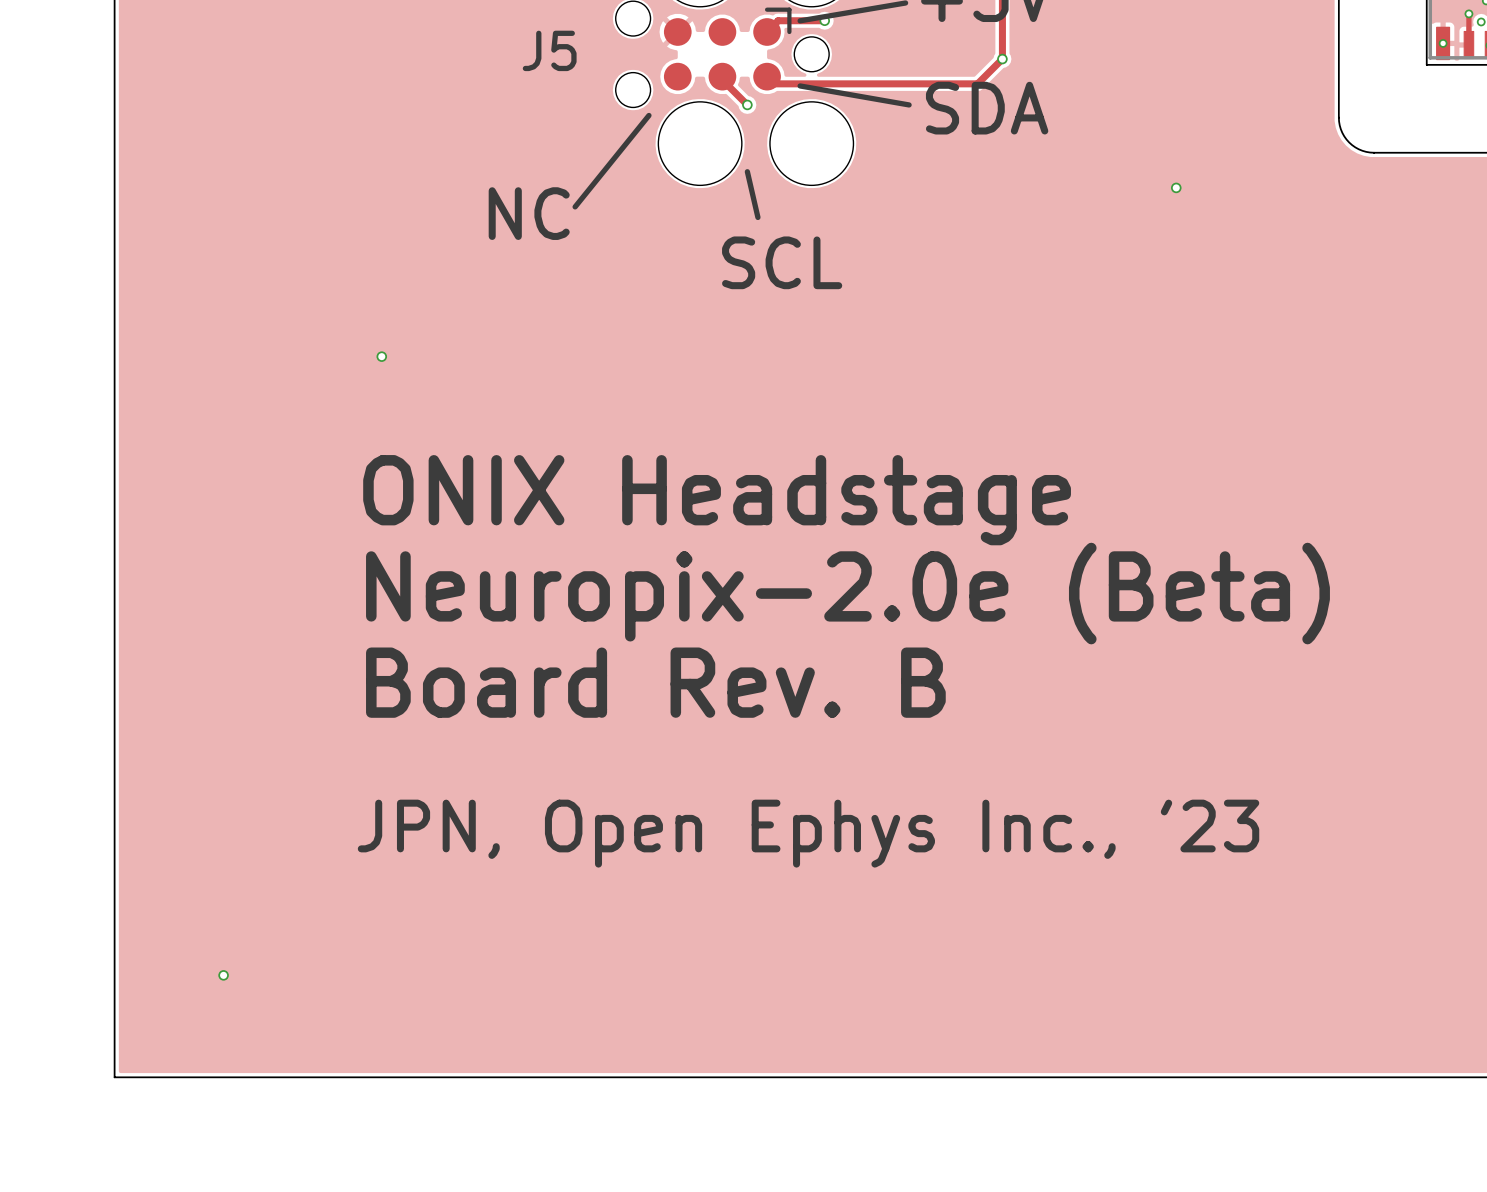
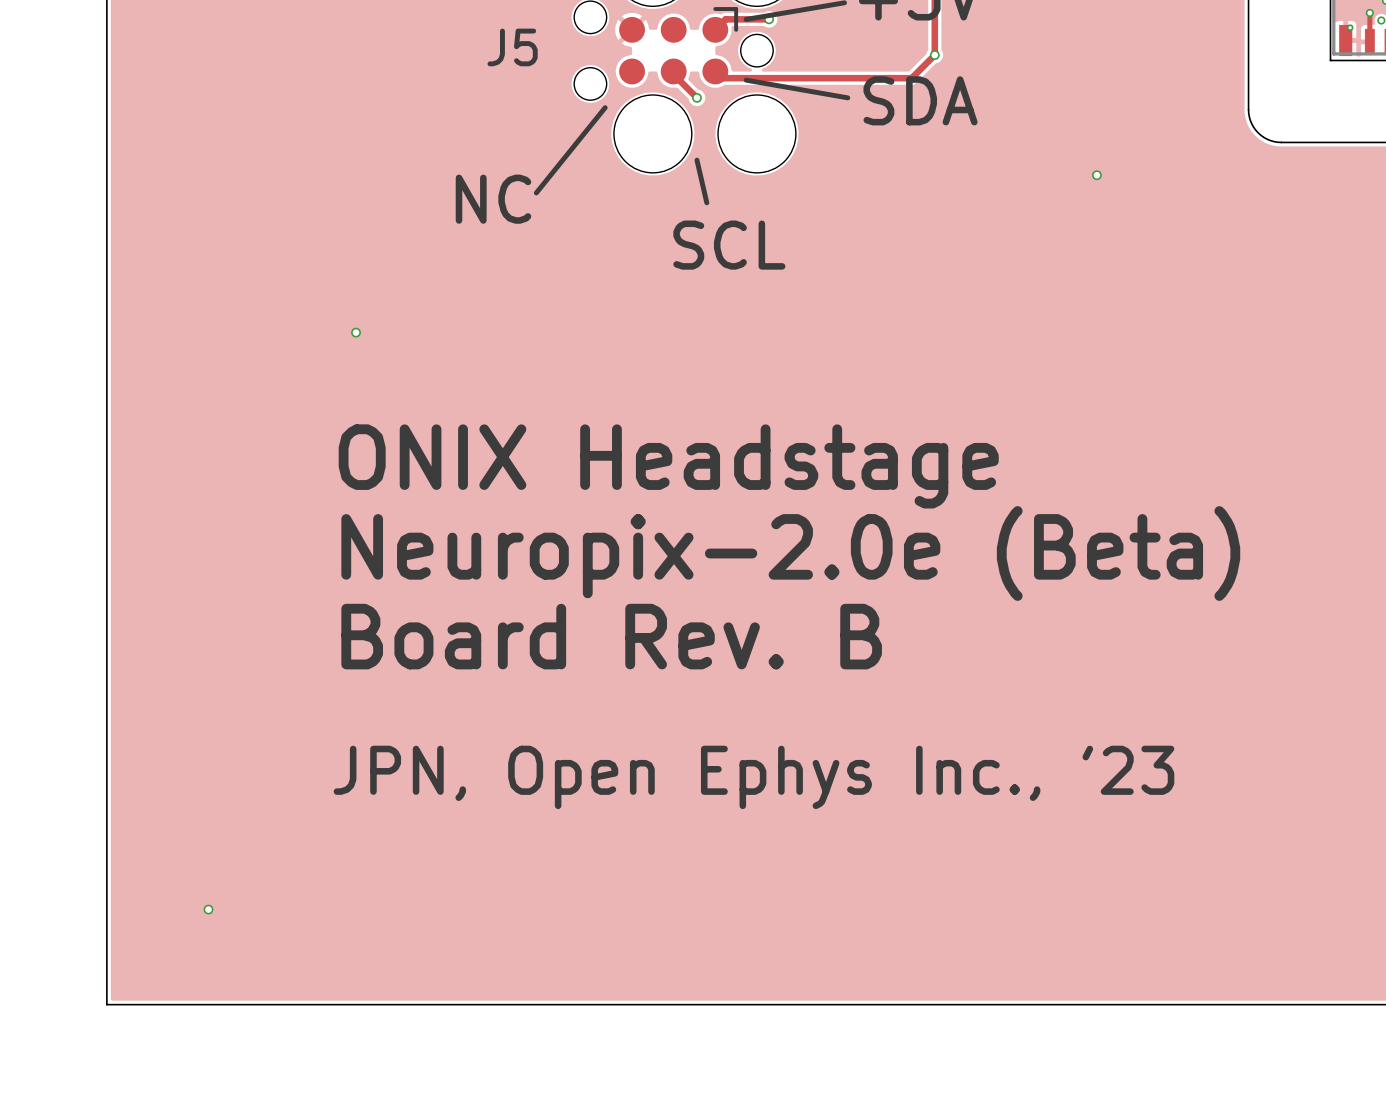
via: none -> (1350, 27)
via: (1443, 43) -> none

